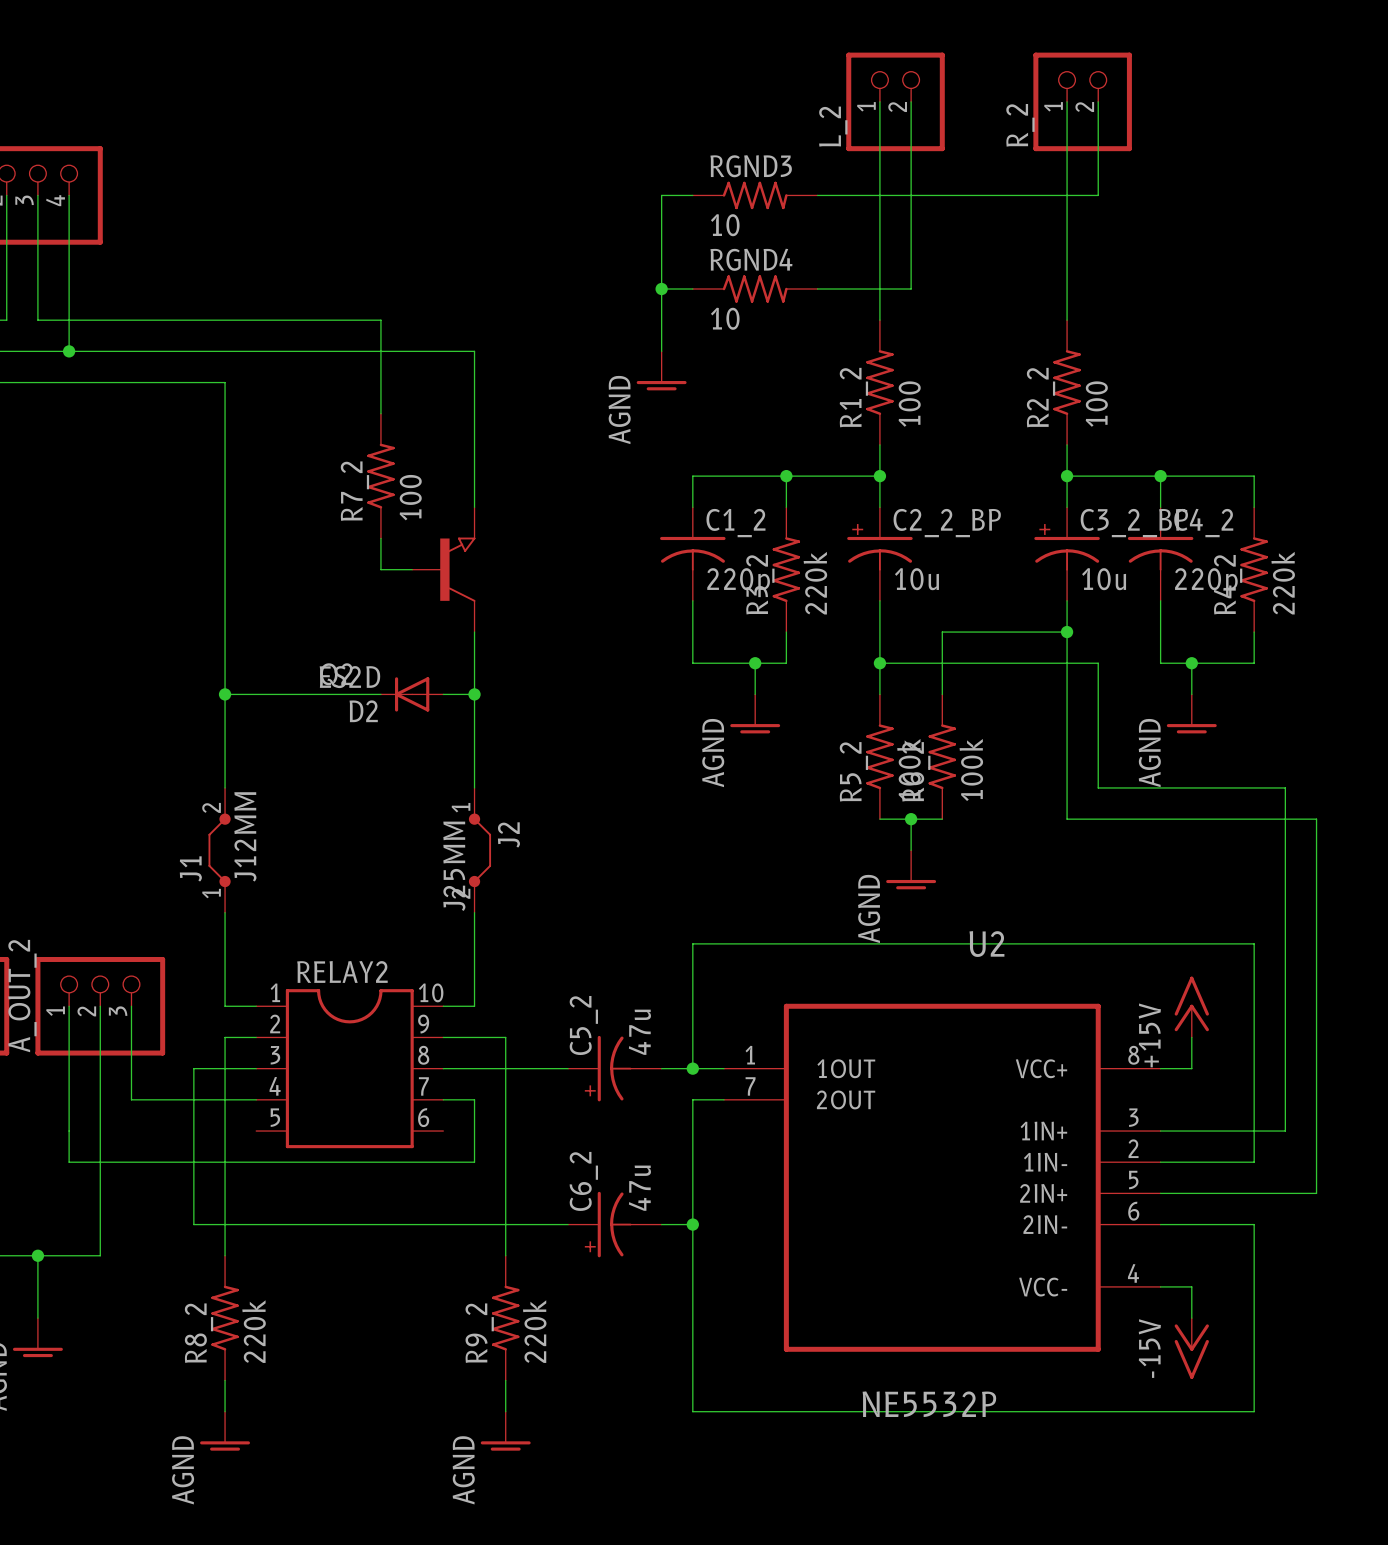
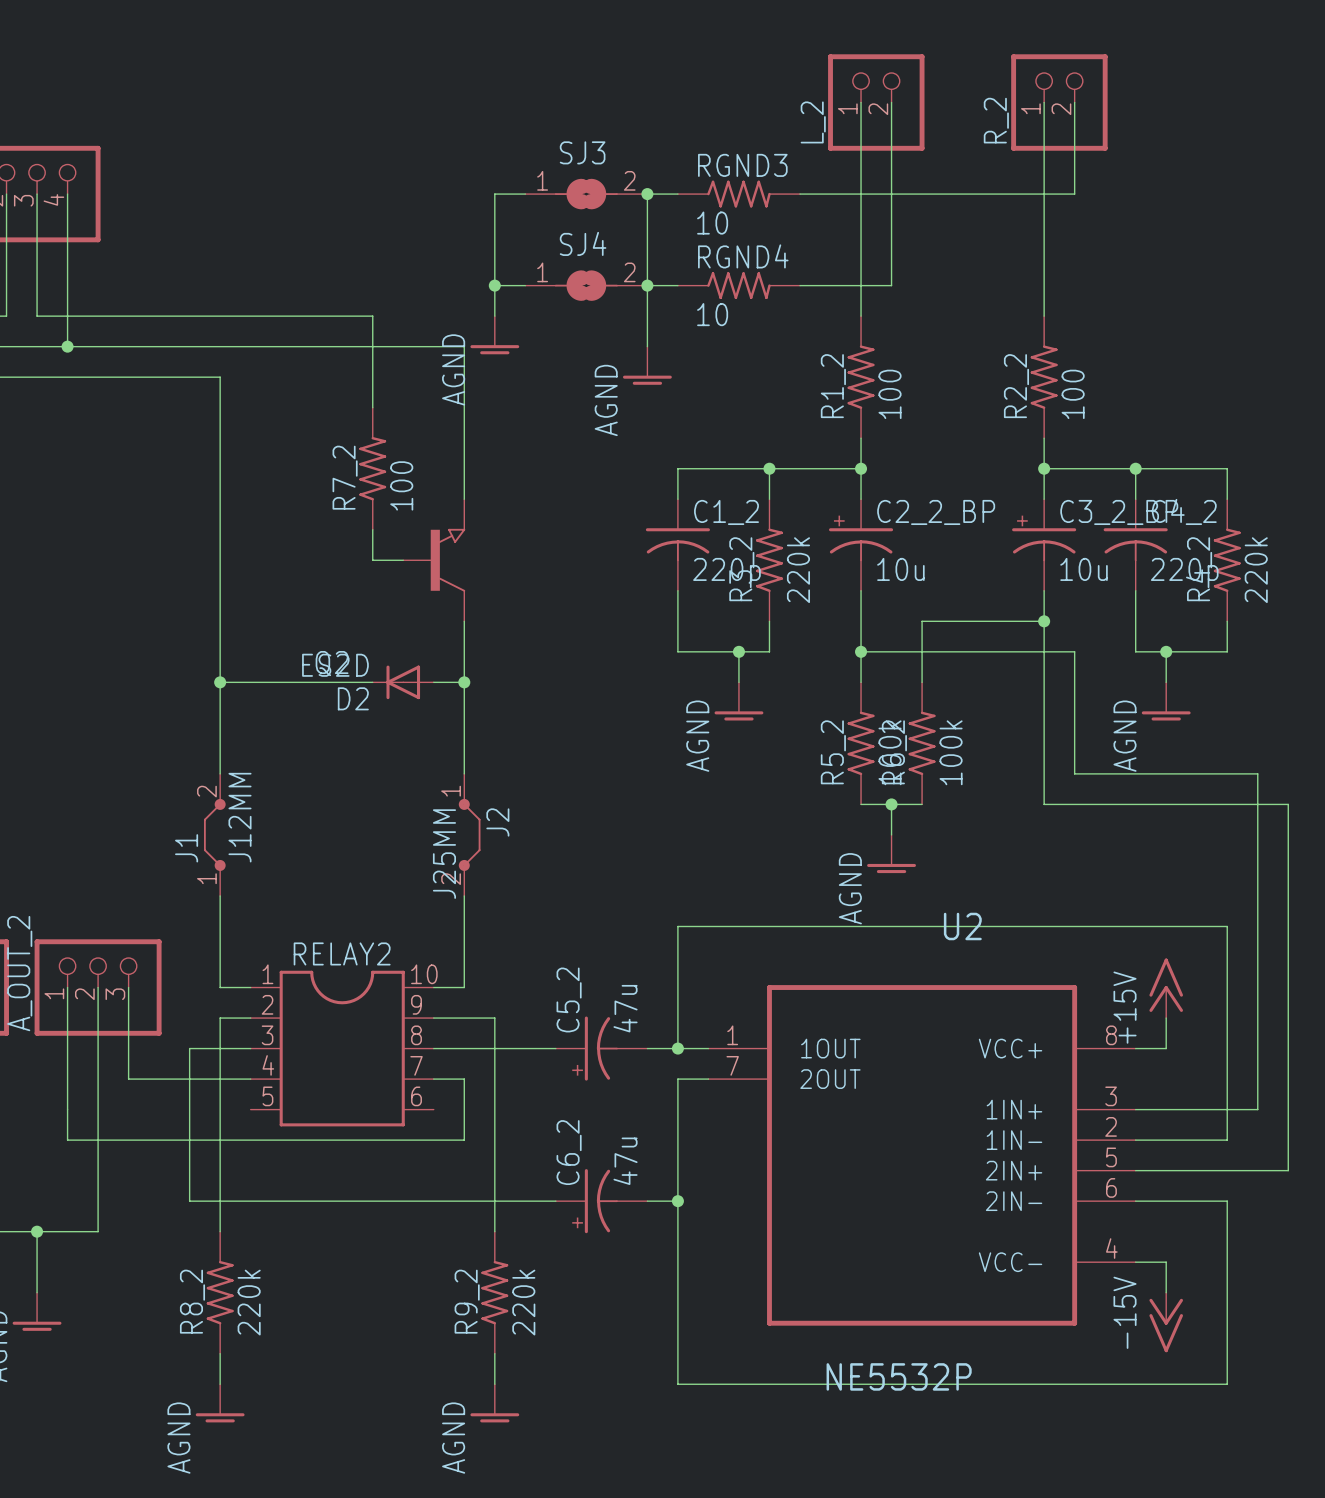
wire: none -> (525, 194) (494, 194) (494, 316)
SJ3: none -> (586, 194)
junction: none -> (647, 194)
wire: none -> (494, 285) (525, 285)
junction: none -> (494, 285)
SJ4: none -> (586, 285)
power symbol: none -> AGND (494, 335)

